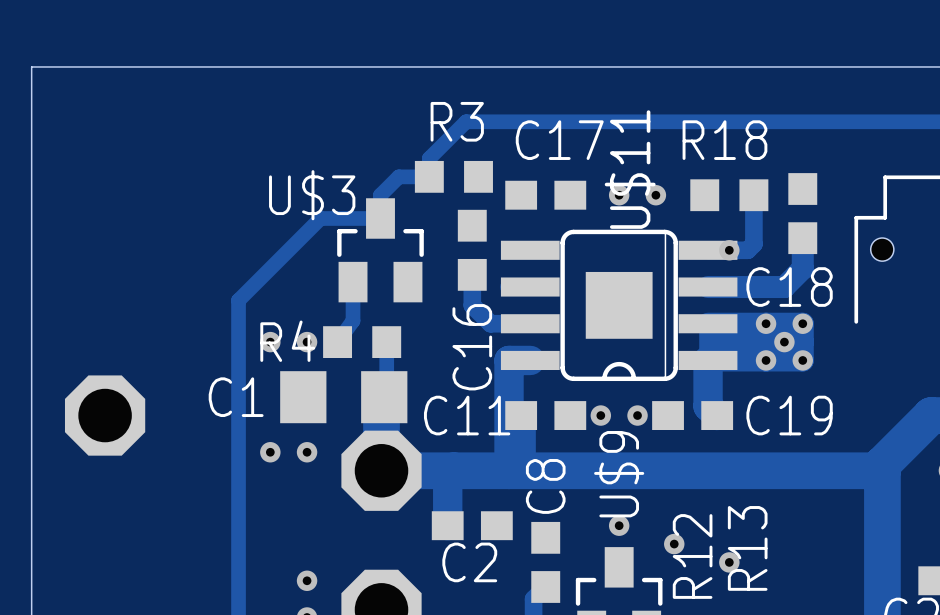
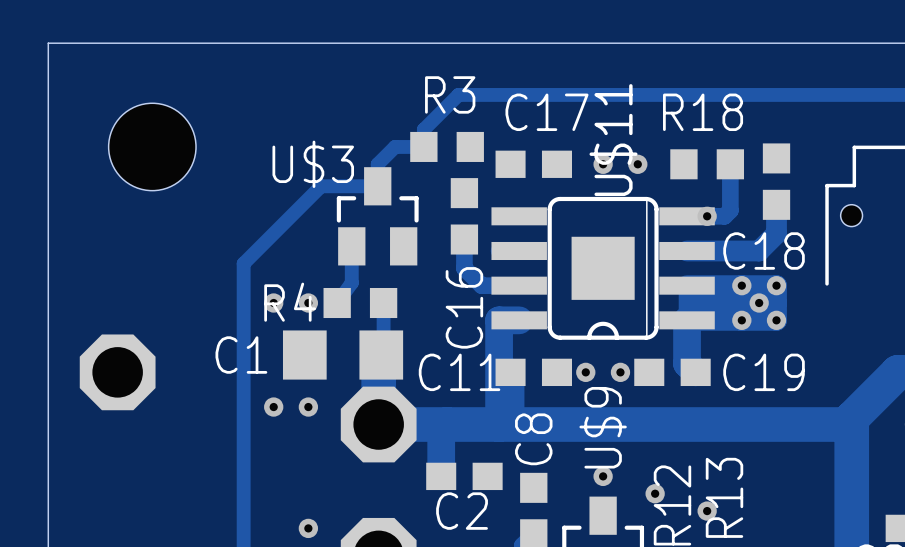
hole: none -> (152, 146)

